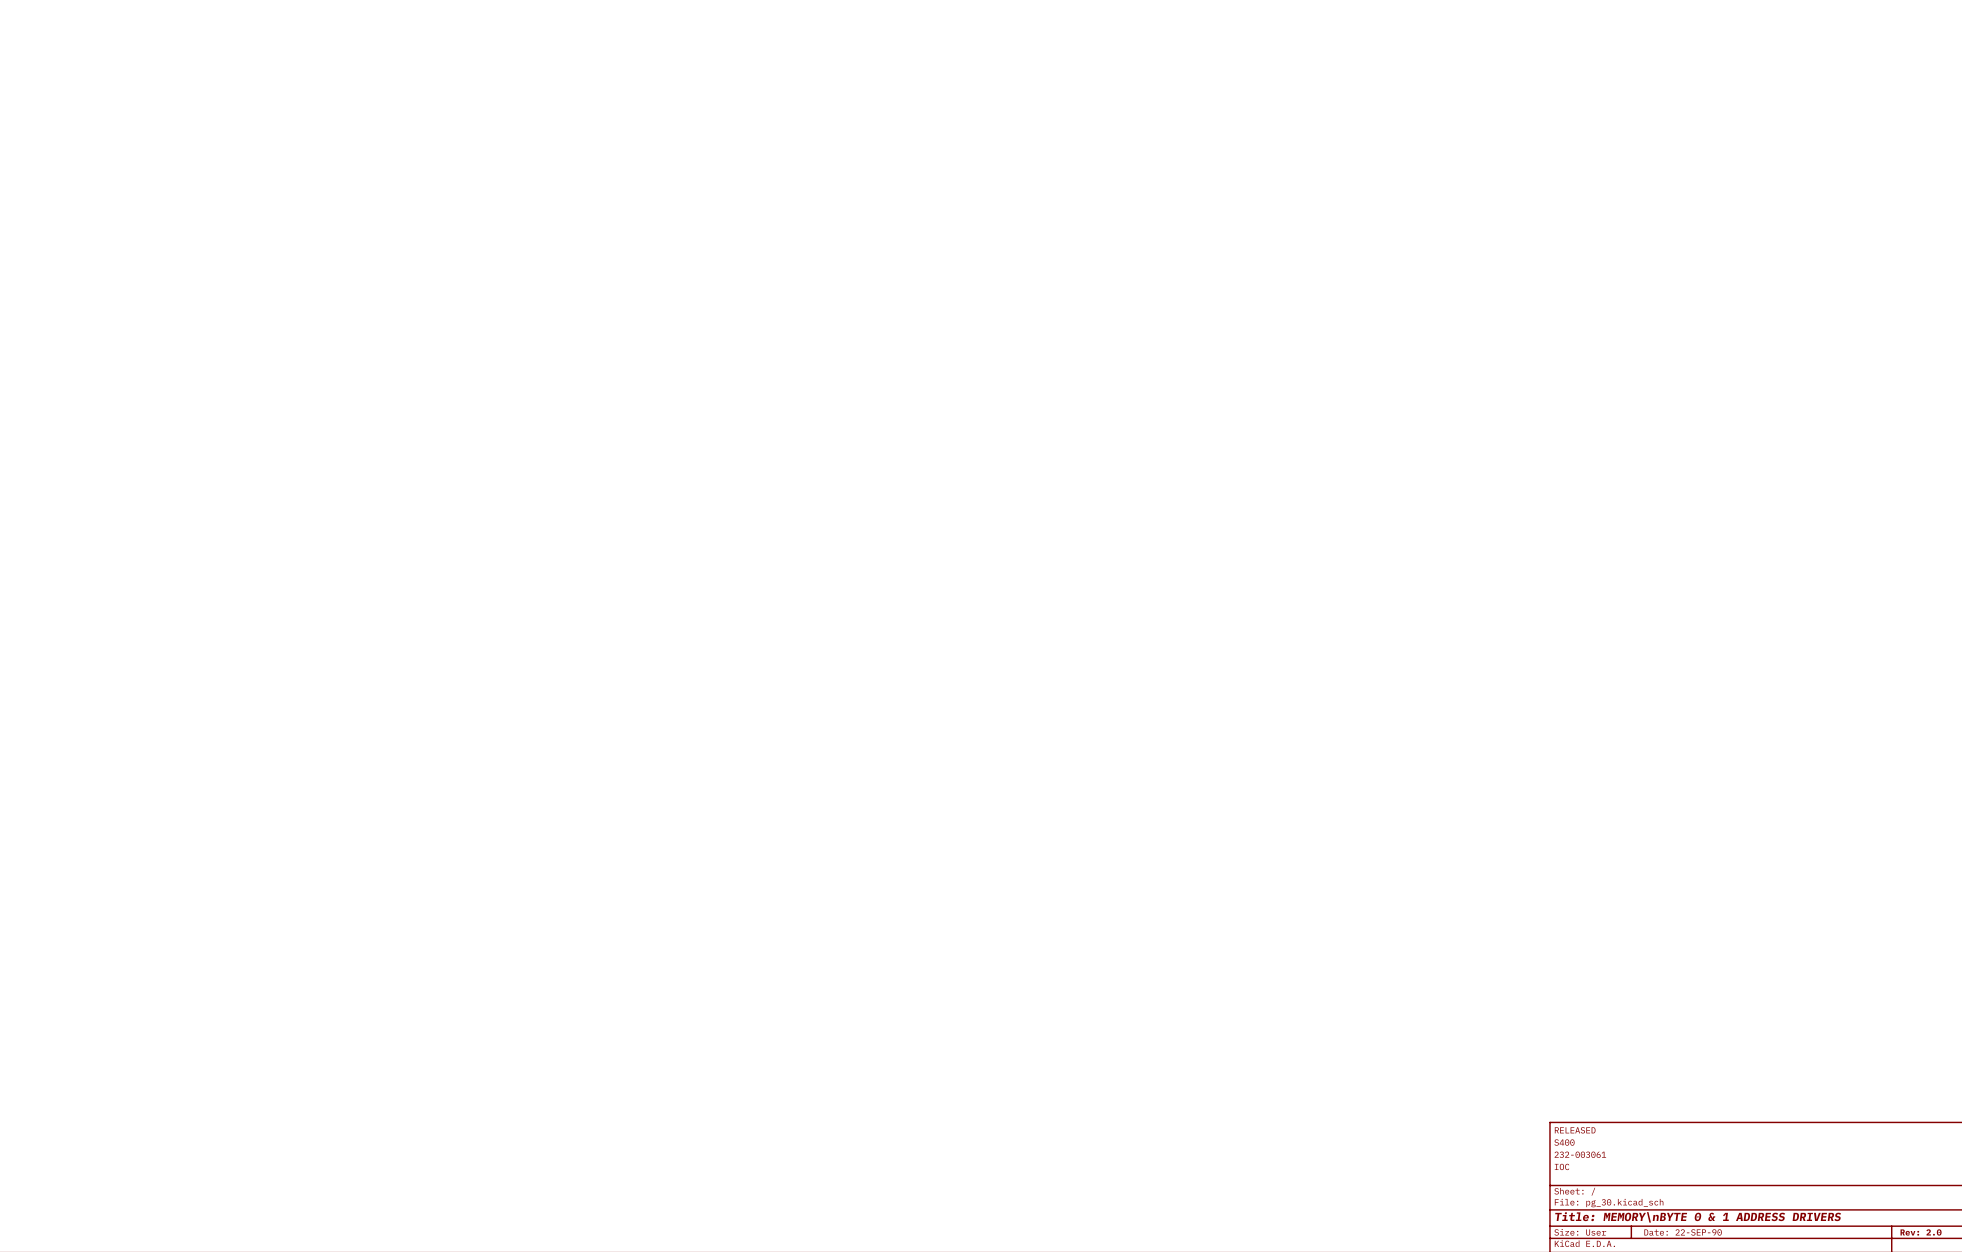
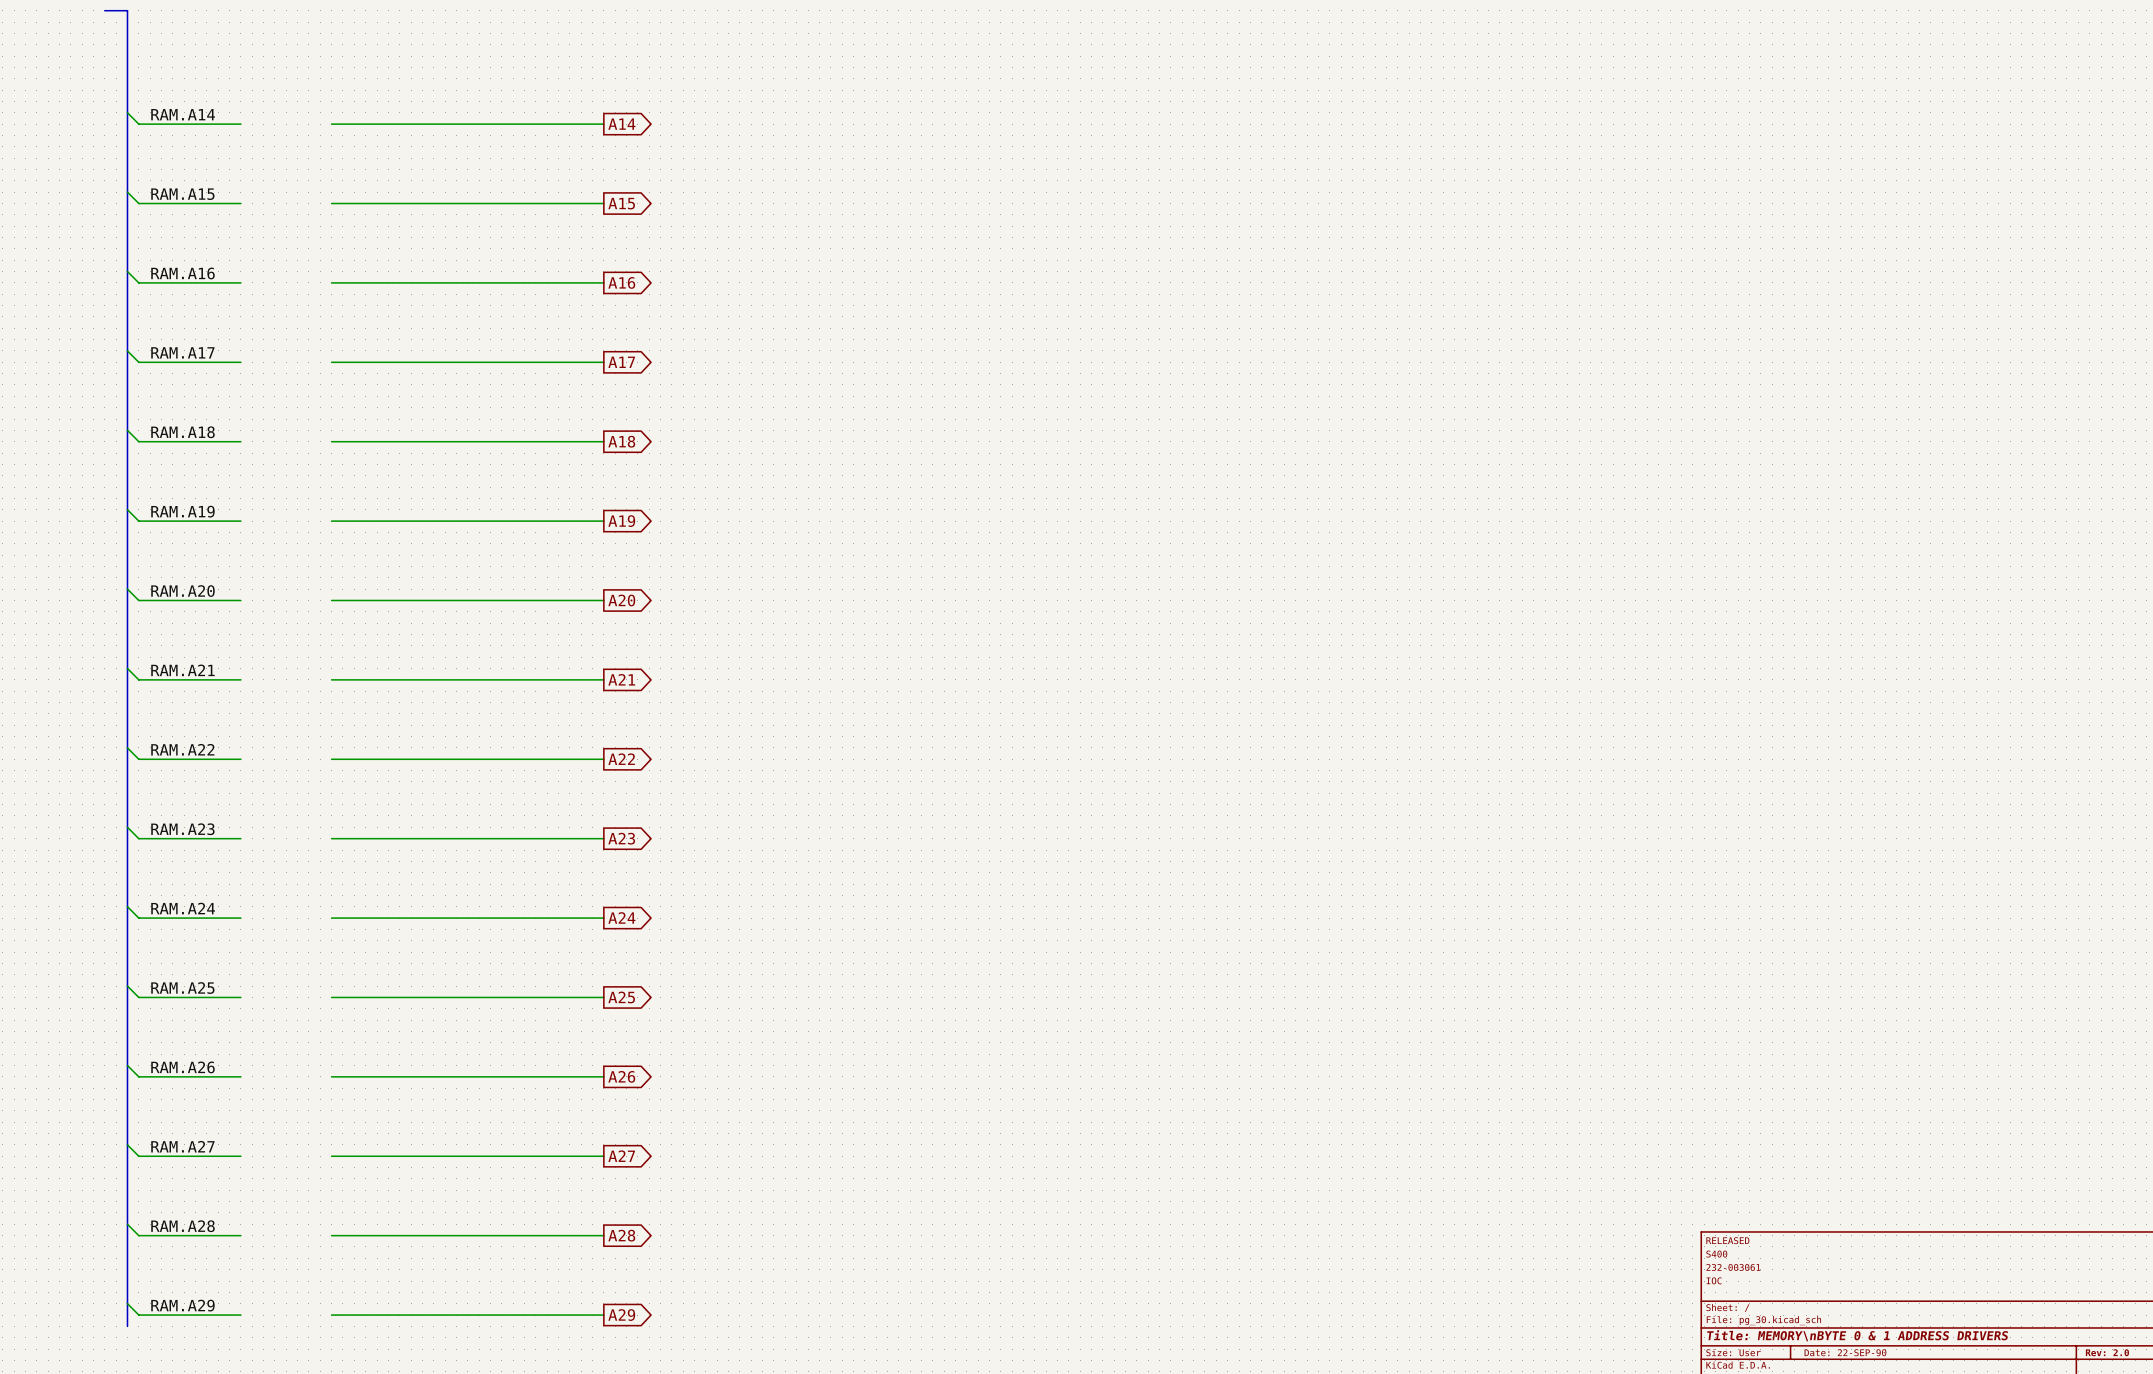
bus: none -> (104, 10) (127, 10) (127, 1326)
wire: none -> (127, 112) (138, 124) (240, 124)
label: none -> RAM.A14 (183, 114)
wire: none -> (331, 124) (603, 124)
global label: none -> A14 (621, 124)
wire: none -> (127, 192) (138, 203) (240, 203)
label: none -> RAM.A15 (182, 194)
wire: none -> (331, 203) (603, 203)
global label: none -> A15 (621, 203)
wire: none -> (127, 271) (138, 282) (240, 282)
label: none -> RAM.A16 (182, 273)
wire: none -> (331, 282) (603, 282)
global label: none -> A16 (621, 282)
wire: none -> (127, 350) (138, 362) (240, 362)
label: none -> RAM.A17 (182, 352)
wire: none -> (331, 362) (603, 362)
global label: none -> A17 (621, 362)
wire: none -> (127, 430) (138, 441) (240, 441)
label: none -> RAM.A18 (183, 432)
wire: none -> (331, 441) (603, 441)
global label: none -> A18 (621, 441)
wire: none -> (127, 509) (138, 521) (240, 521)
label: none -> RAM.A19 (182, 511)
wire: none -> (331, 521) (603, 521)
global label: none -> A19 (621, 521)
wire: none -> (127, 589) (138, 600) (240, 600)
label: none -> RAM.A20 (182, 591)
wire: none -> (331, 600) (603, 600)
global label: none -> A20 (621, 600)
wire: none -> (127, 668) (138, 679) (240, 679)
label: none -> RAM.A21 (182, 670)
wire: none -> (331, 679) (603, 679)
global label: none -> A21 (621, 679)
wire: none -> (127, 747) (138, 759) (240, 759)
label: none -> RAM.A22 (182, 749)
wire: none -> (331, 759) (603, 759)
global label: none -> A22 (621, 759)
wire: none -> (127, 827) (138, 838) (240, 838)
label: none -> RAM.A23 (182, 829)
wire: none -> (331, 838) (603, 838)
global label: none -> A23 (621, 838)
wire: none -> (127, 906) (138, 918) (240, 918)
label: none -> RAM.A24 (183, 908)
wire: none -> (331, 918) (603, 918)
global label: none -> A24 (621, 917)
wire: none -> (127, 986) (138, 997) (240, 997)
label: none -> RAM.A25 (182, 988)
wire: none -> (331, 997) (603, 997)
global label: none -> A25 (621, 997)
wire: none -> (127, 1065) (138, 1076) (240, 1076)
label: none -> RAM.A26 (182, 1067)
wire: none -> (331, 1076) (603, 1076)
global label: none -> A26 (621, 1076)
wire: none -> (127, 1144) (138, 1156) (240, 1156)
label: none -> RAM.A27 (182, 1146)
wire: none -> (331, 1156) (603, 1156)
global label: none -> A27 (621, 1156)
wire: none -> (127, 1224) (138, 1235) (240, 1235)
label: none -> RAM.A28 (183, 1226)
wire: none -> (331, 1235) (603, 1235)
global label: none -> A28 (621, 1235)
wire: none -> (127, 1303) (138, 1315) (240, 1315)
label: none -> RAM.A29 (182, 1305)
wire: none -> (331, 1315) (603, 1315)
global label: none -> A29 (621, 1315)

